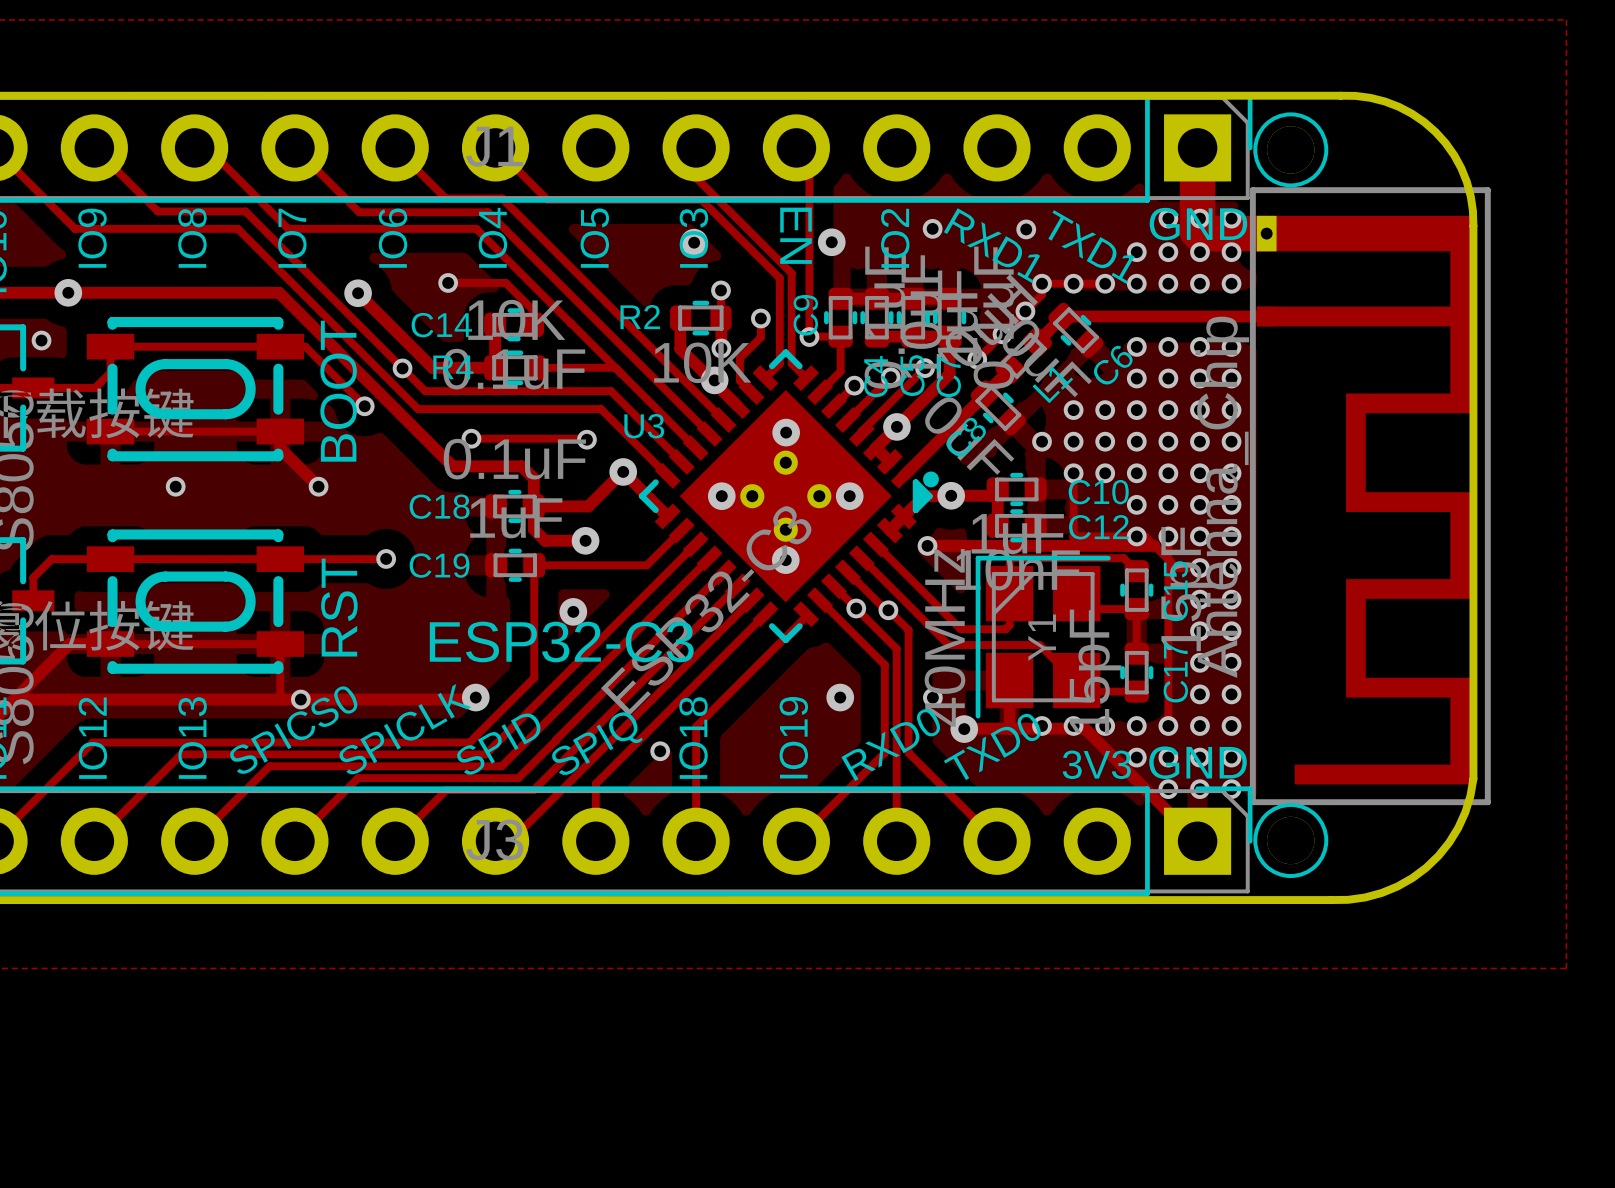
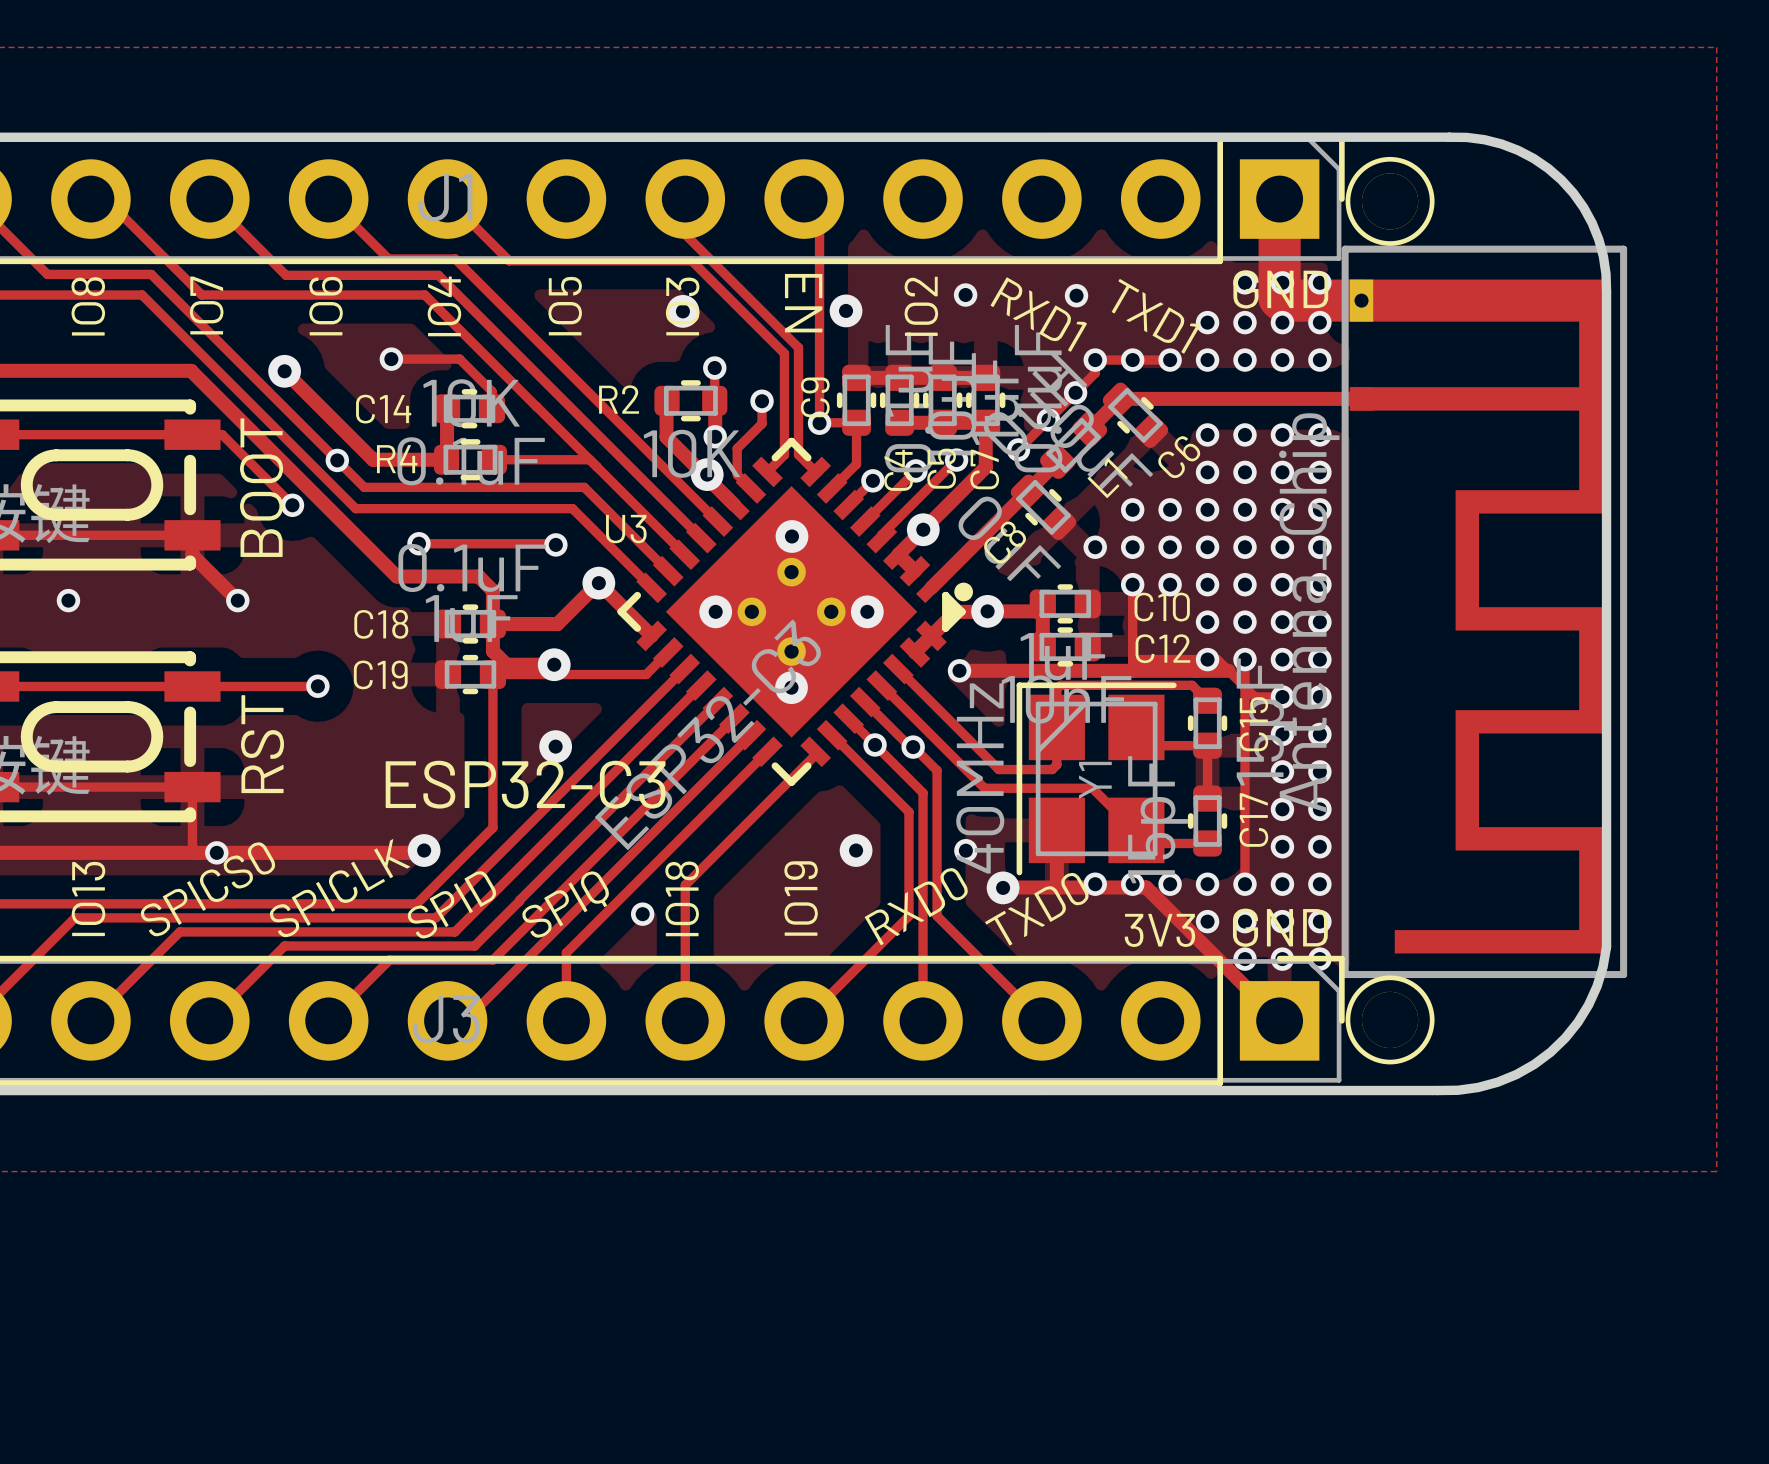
track: (663, 549) (646, 565) (534, 565) (534, 677) -> (646, 674) (492, 674) (492, 827)
C19 position: (515, 565) -> (470, 674)
via position: (573, 611) -> (555, 746)

